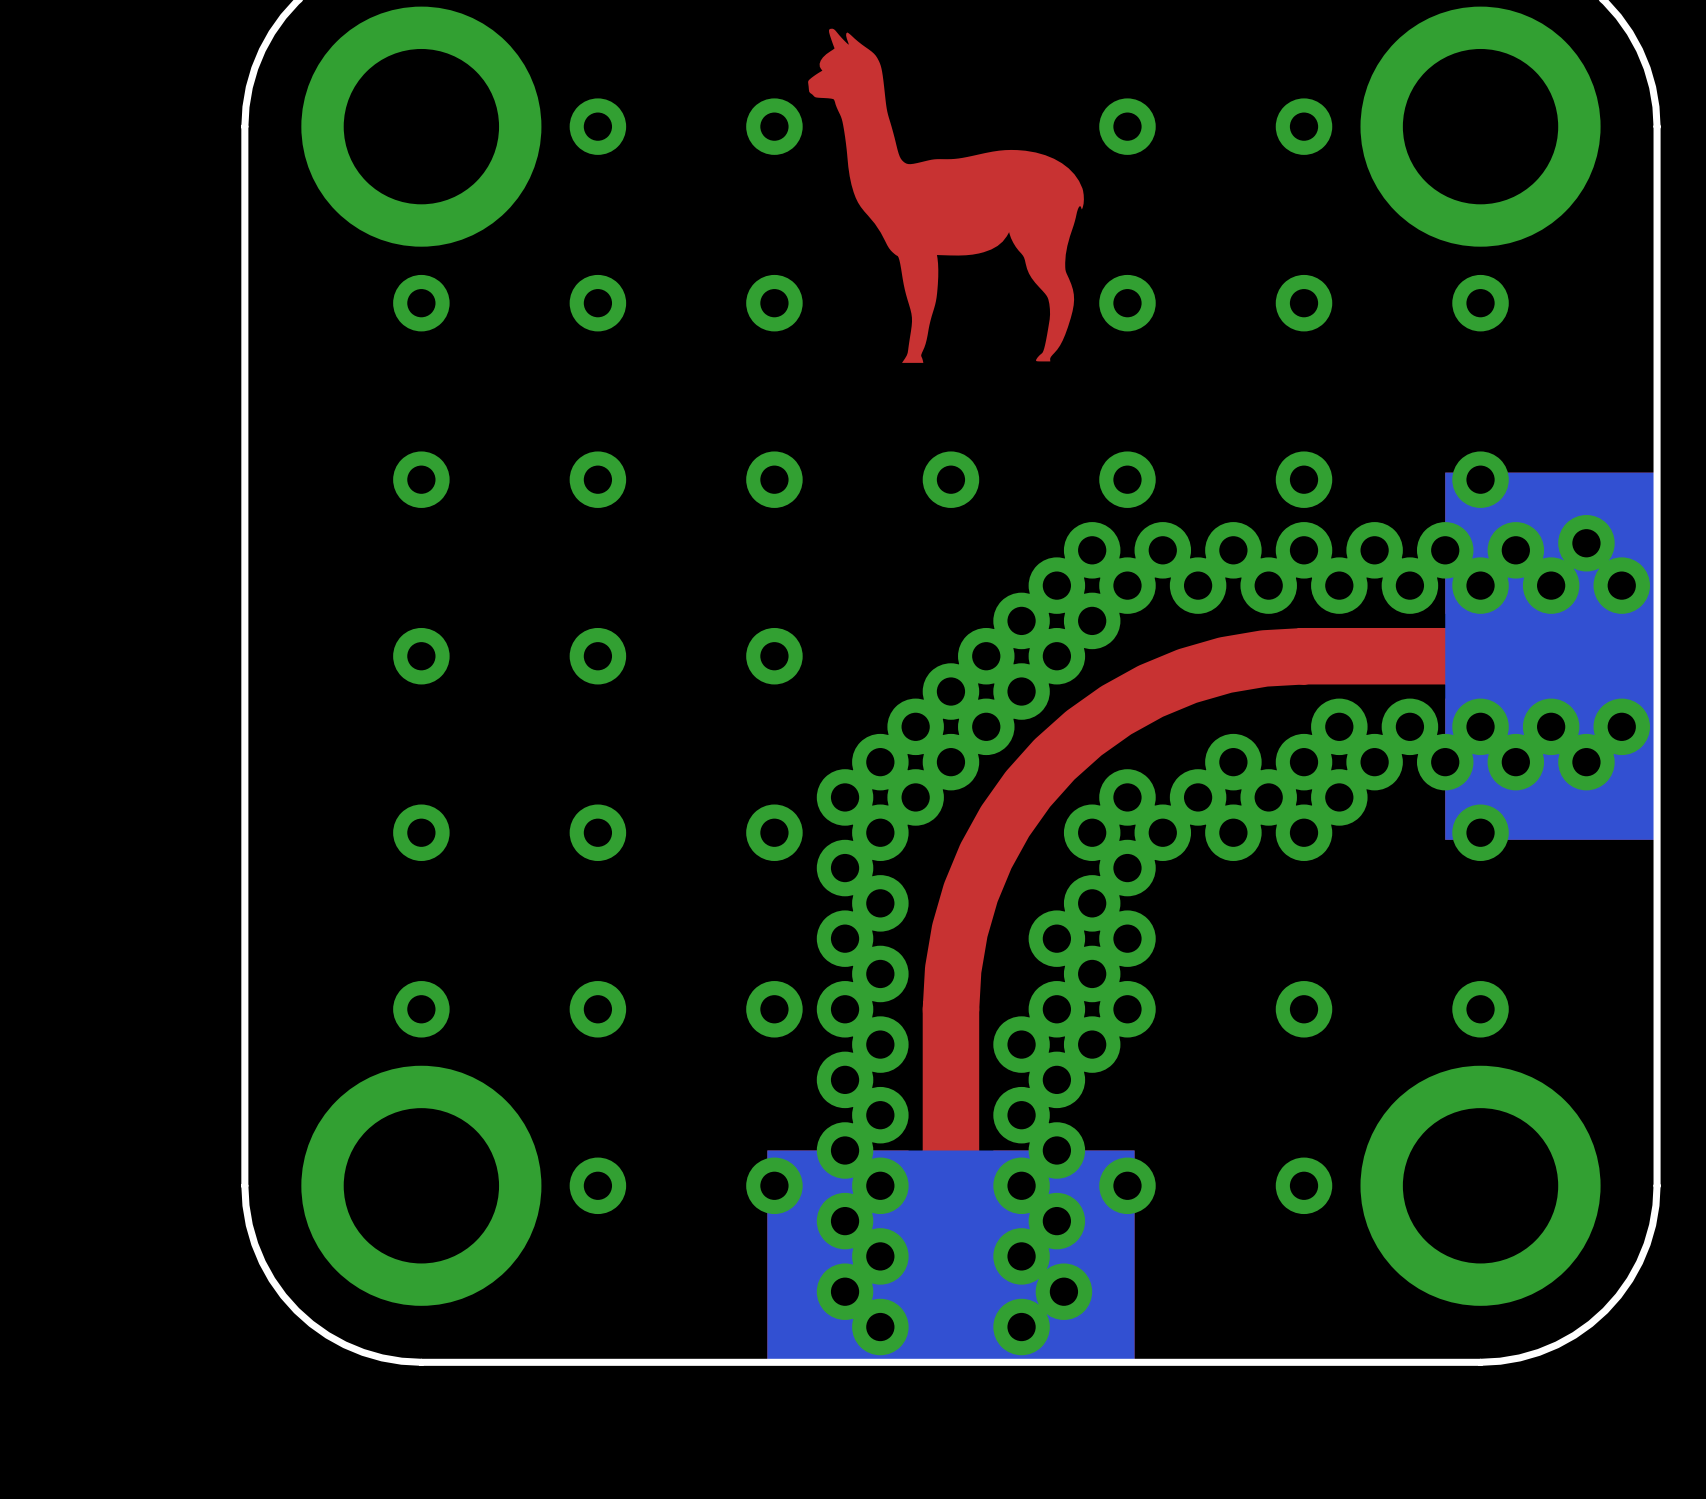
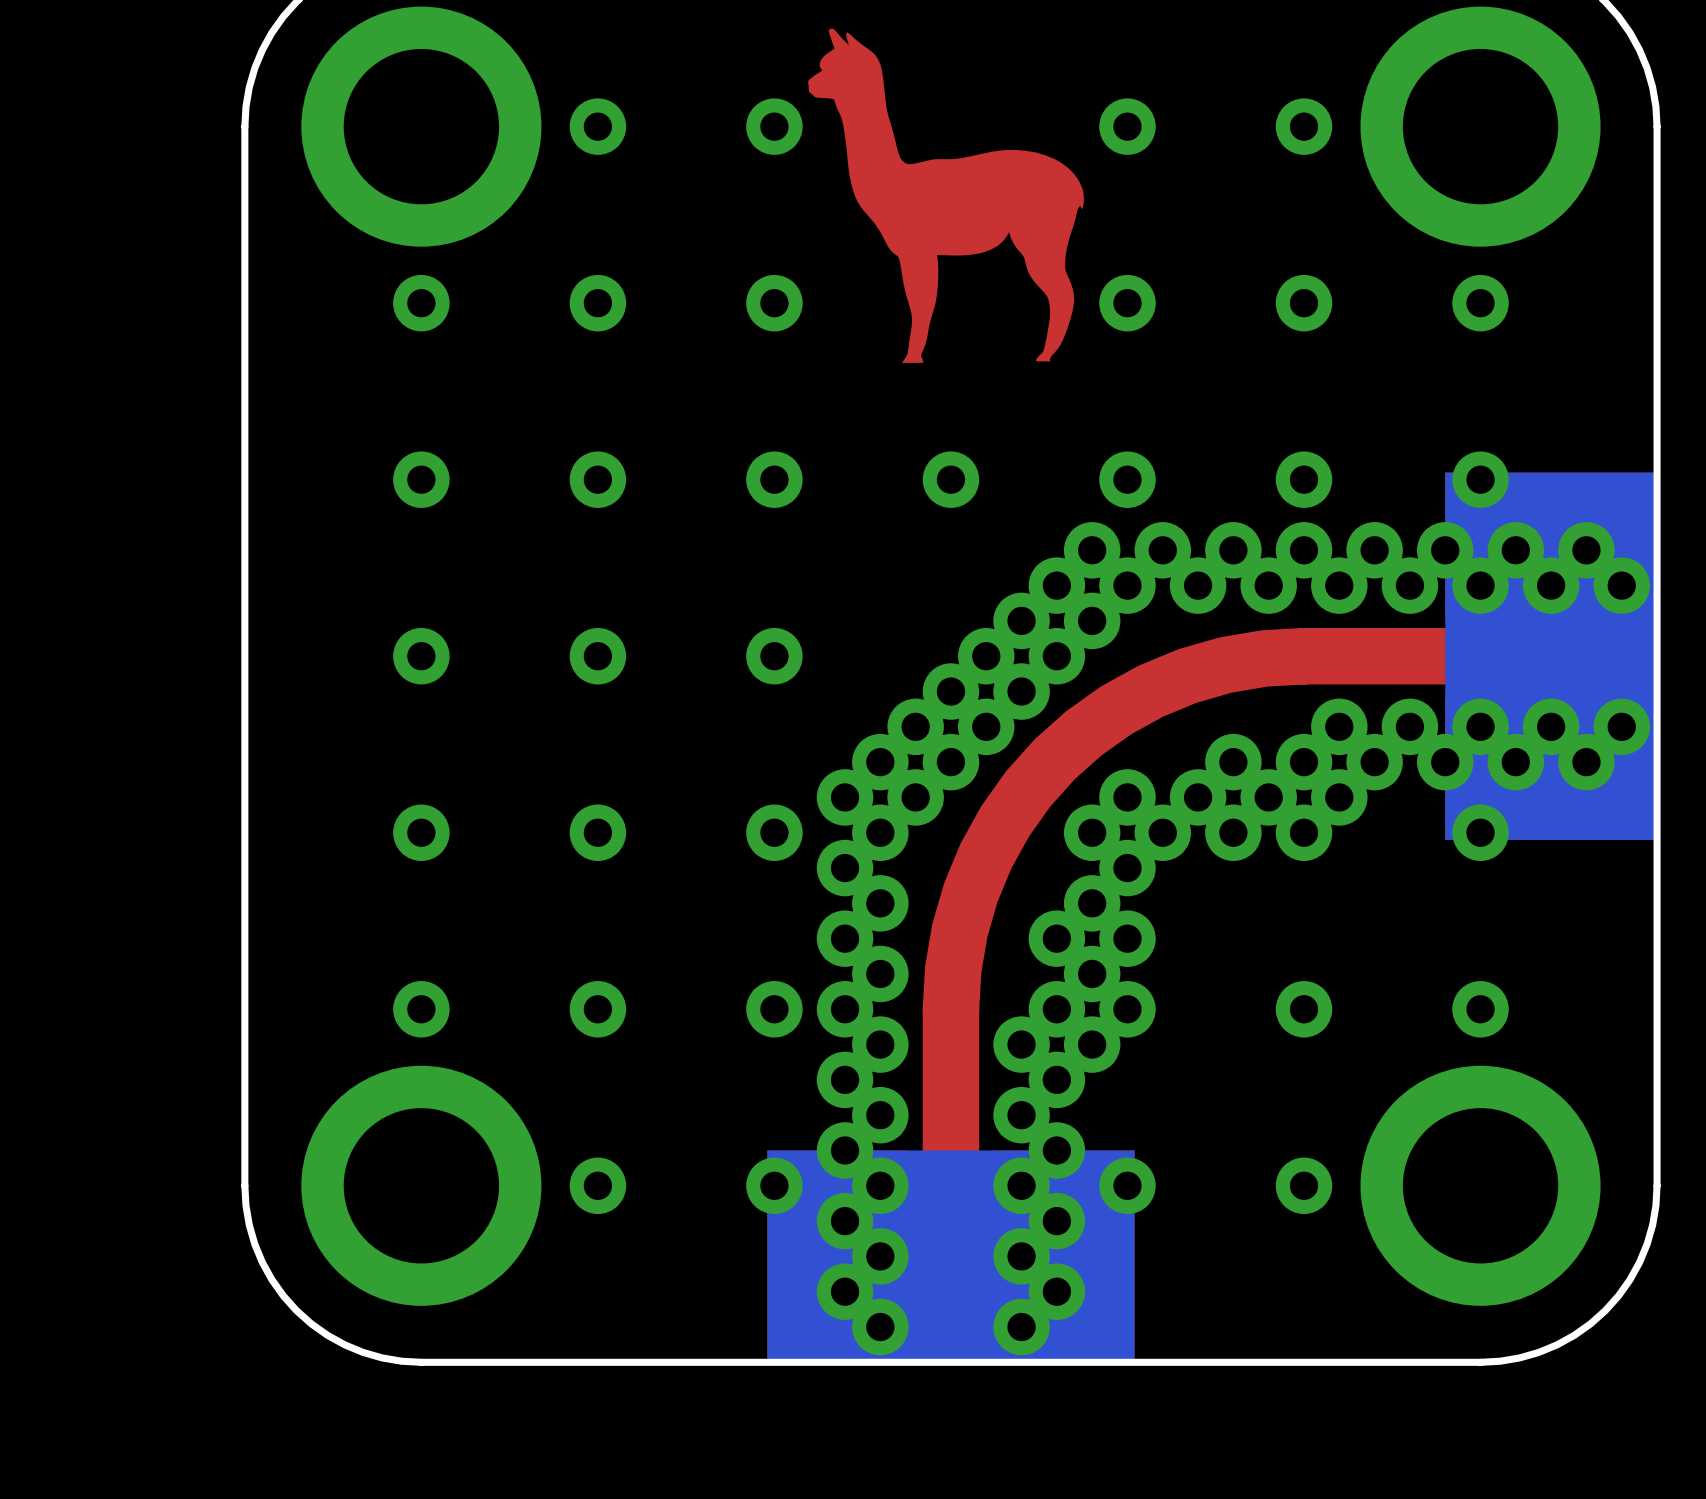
part footprint: [1445, 472, 1658, 840] -> [1445, 472, 1658, 840]
part footprint: [767, 1150, 1135, 1363] -> [767, 1150, 1135, 1363]

